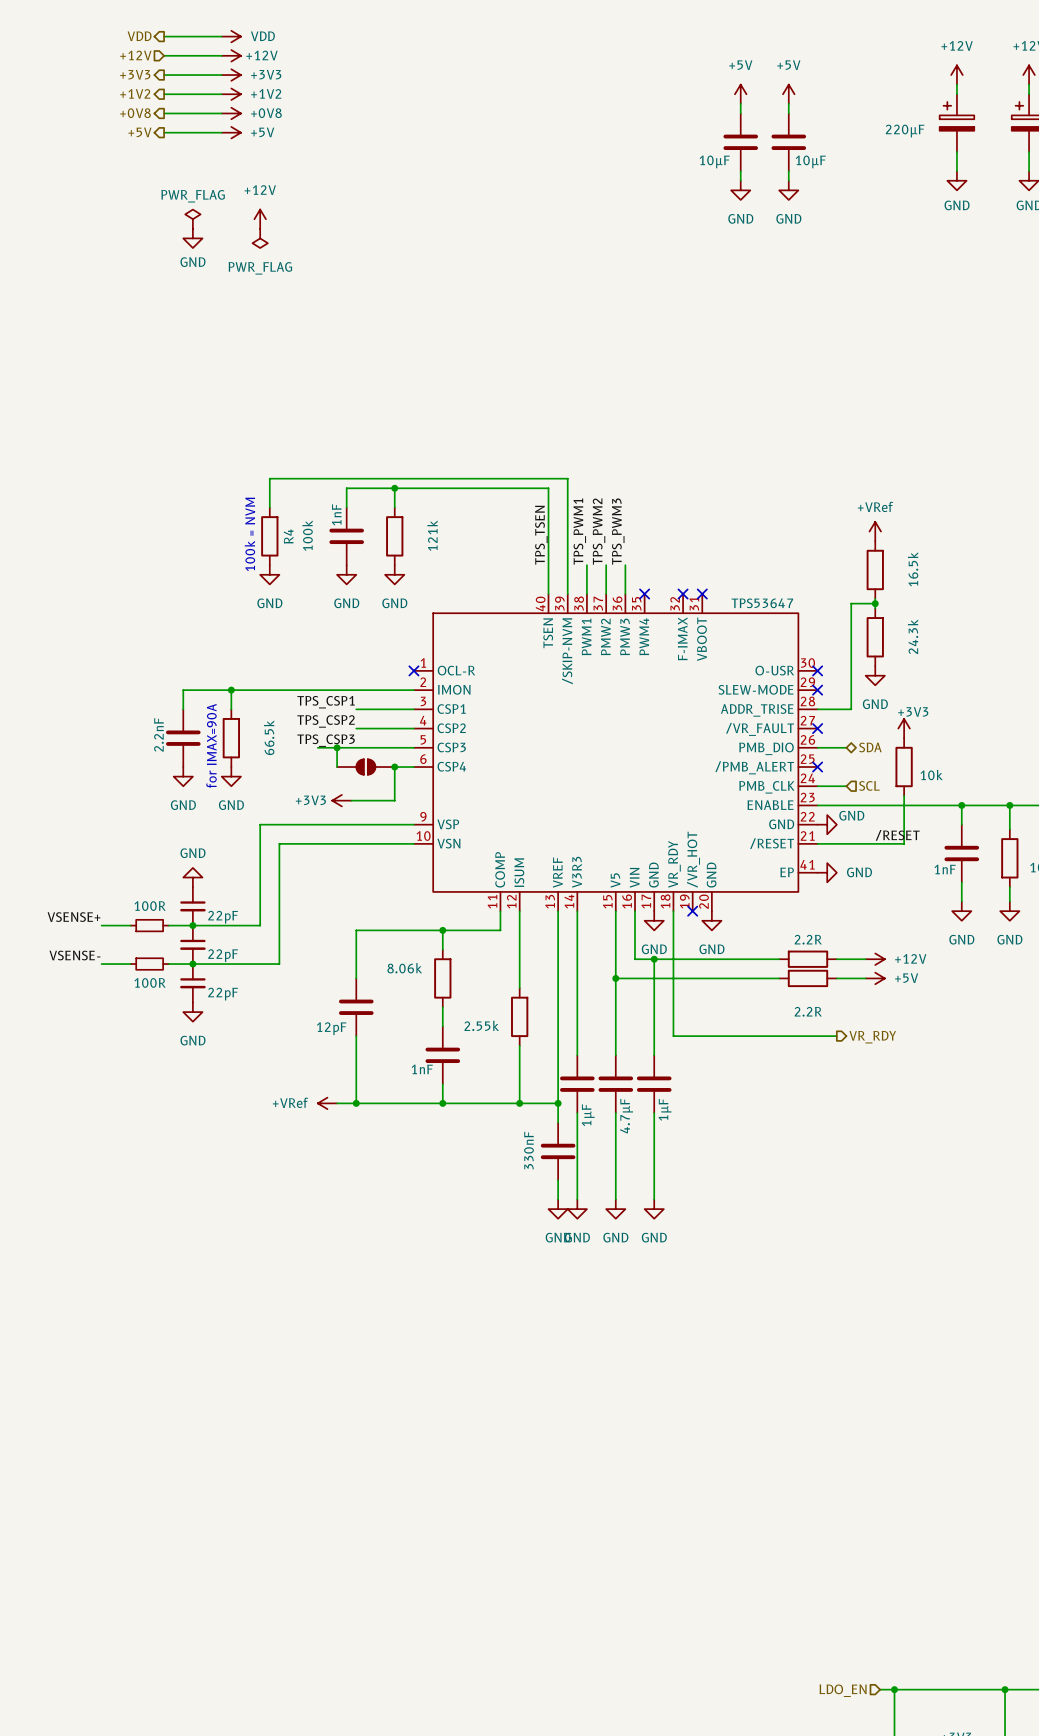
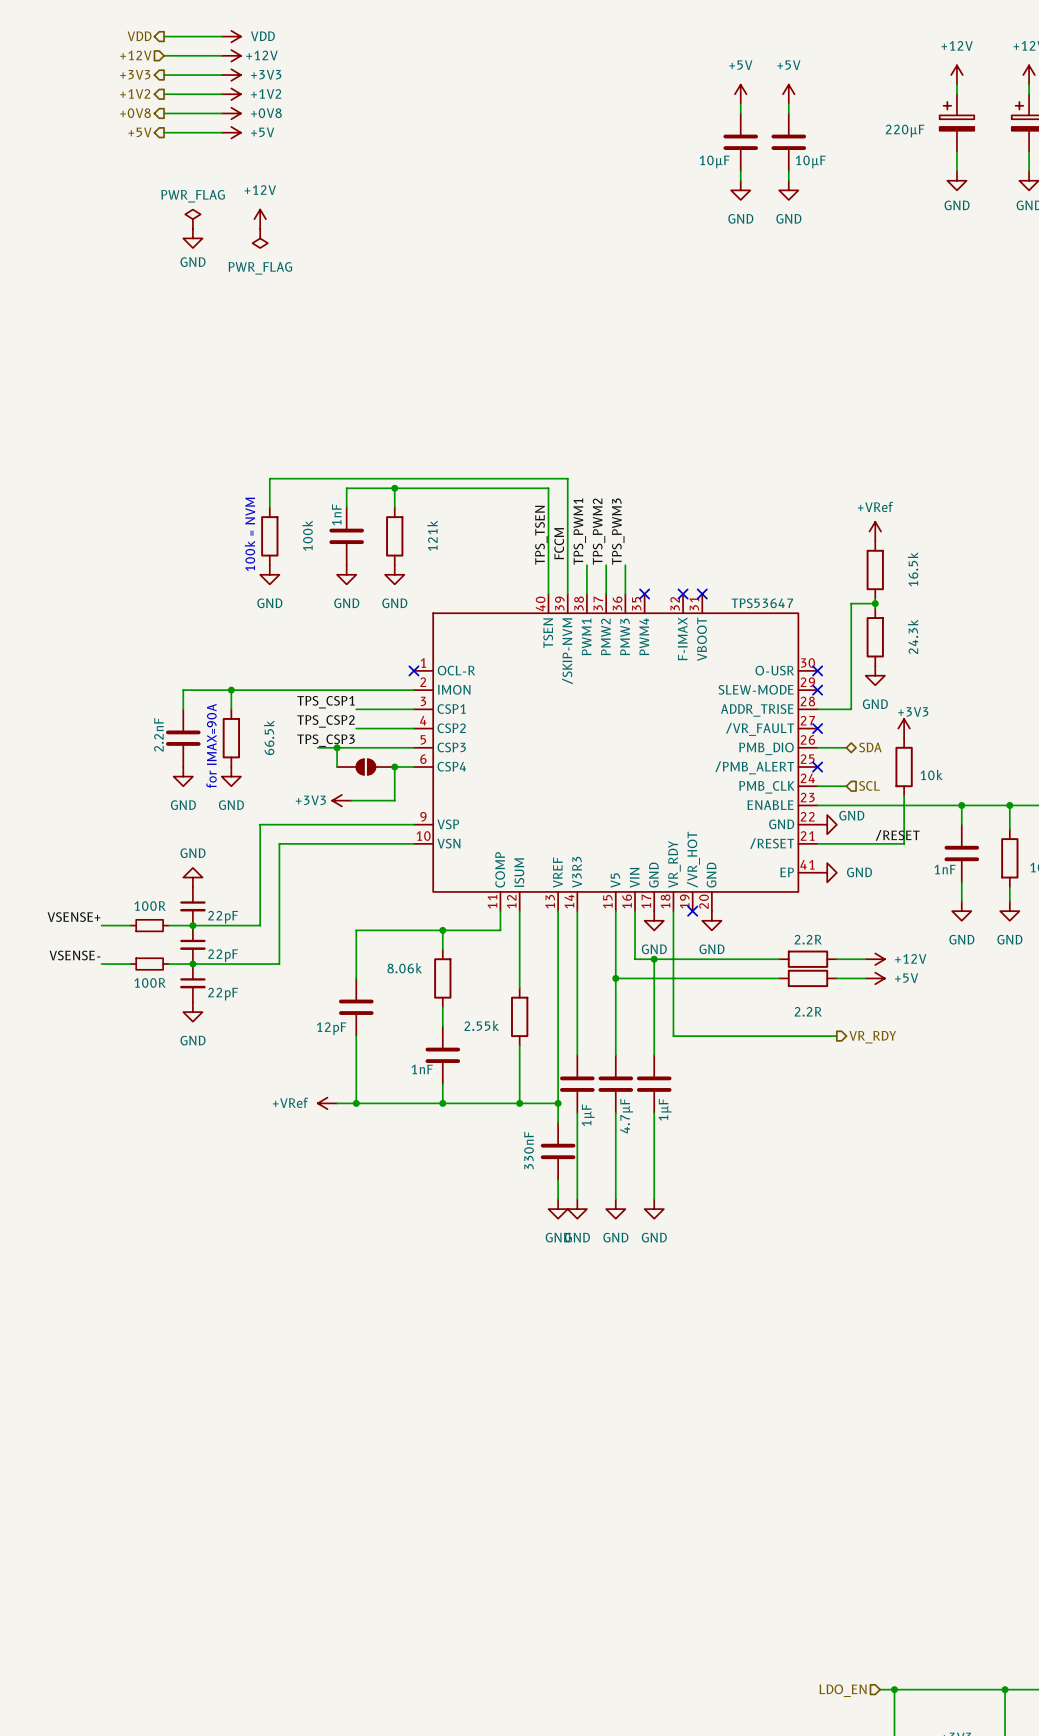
R4 name: R4 (288, 536) -> none
label: none -> FCCM (559, 543)

